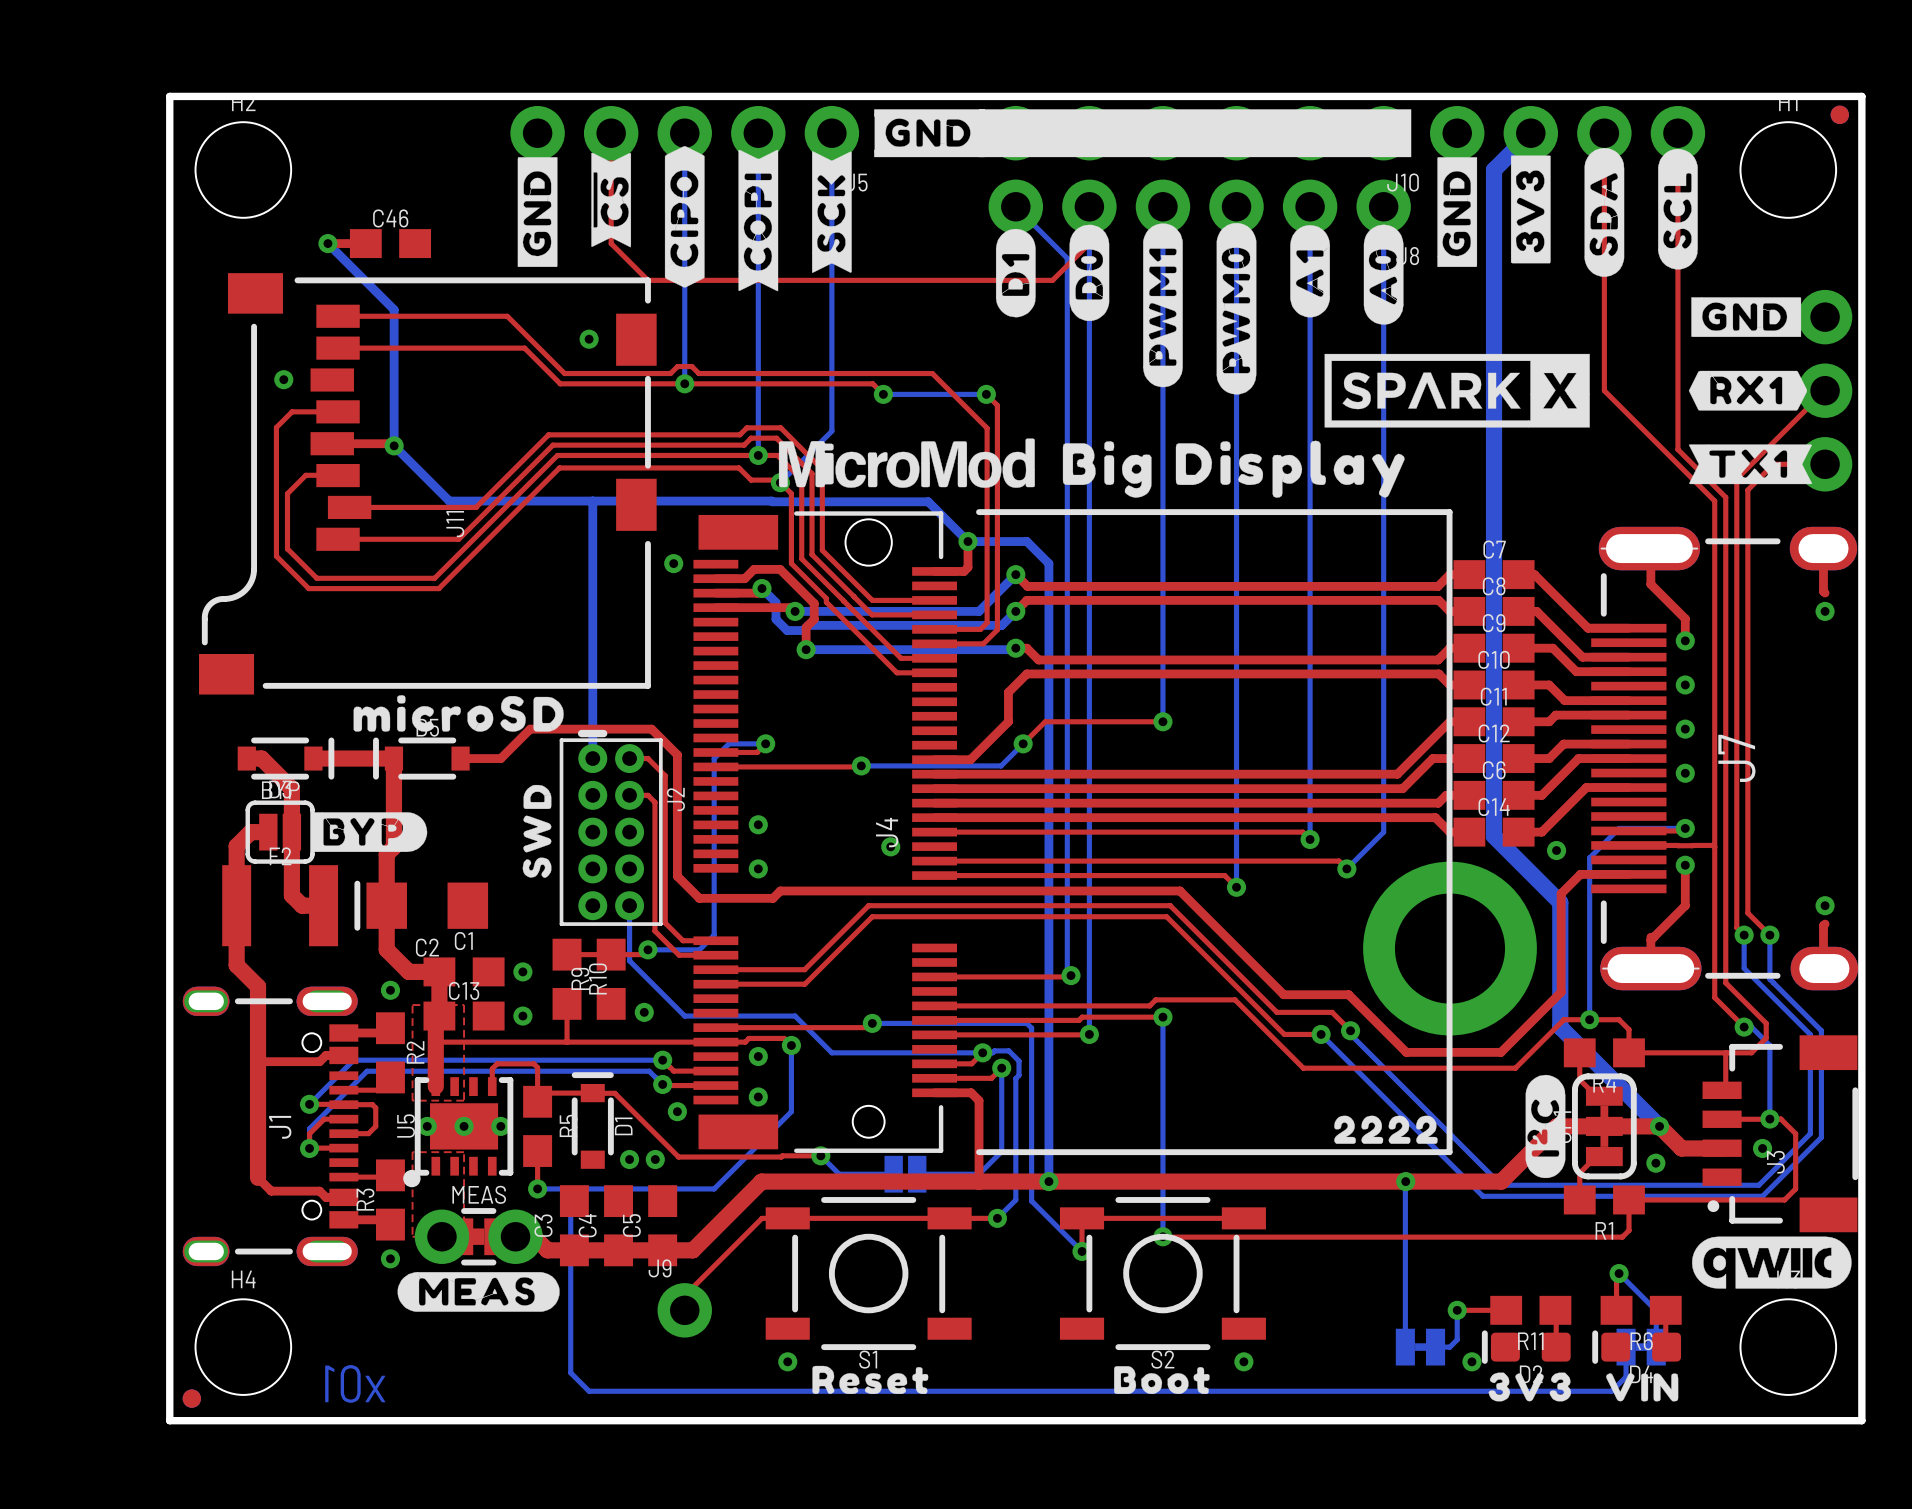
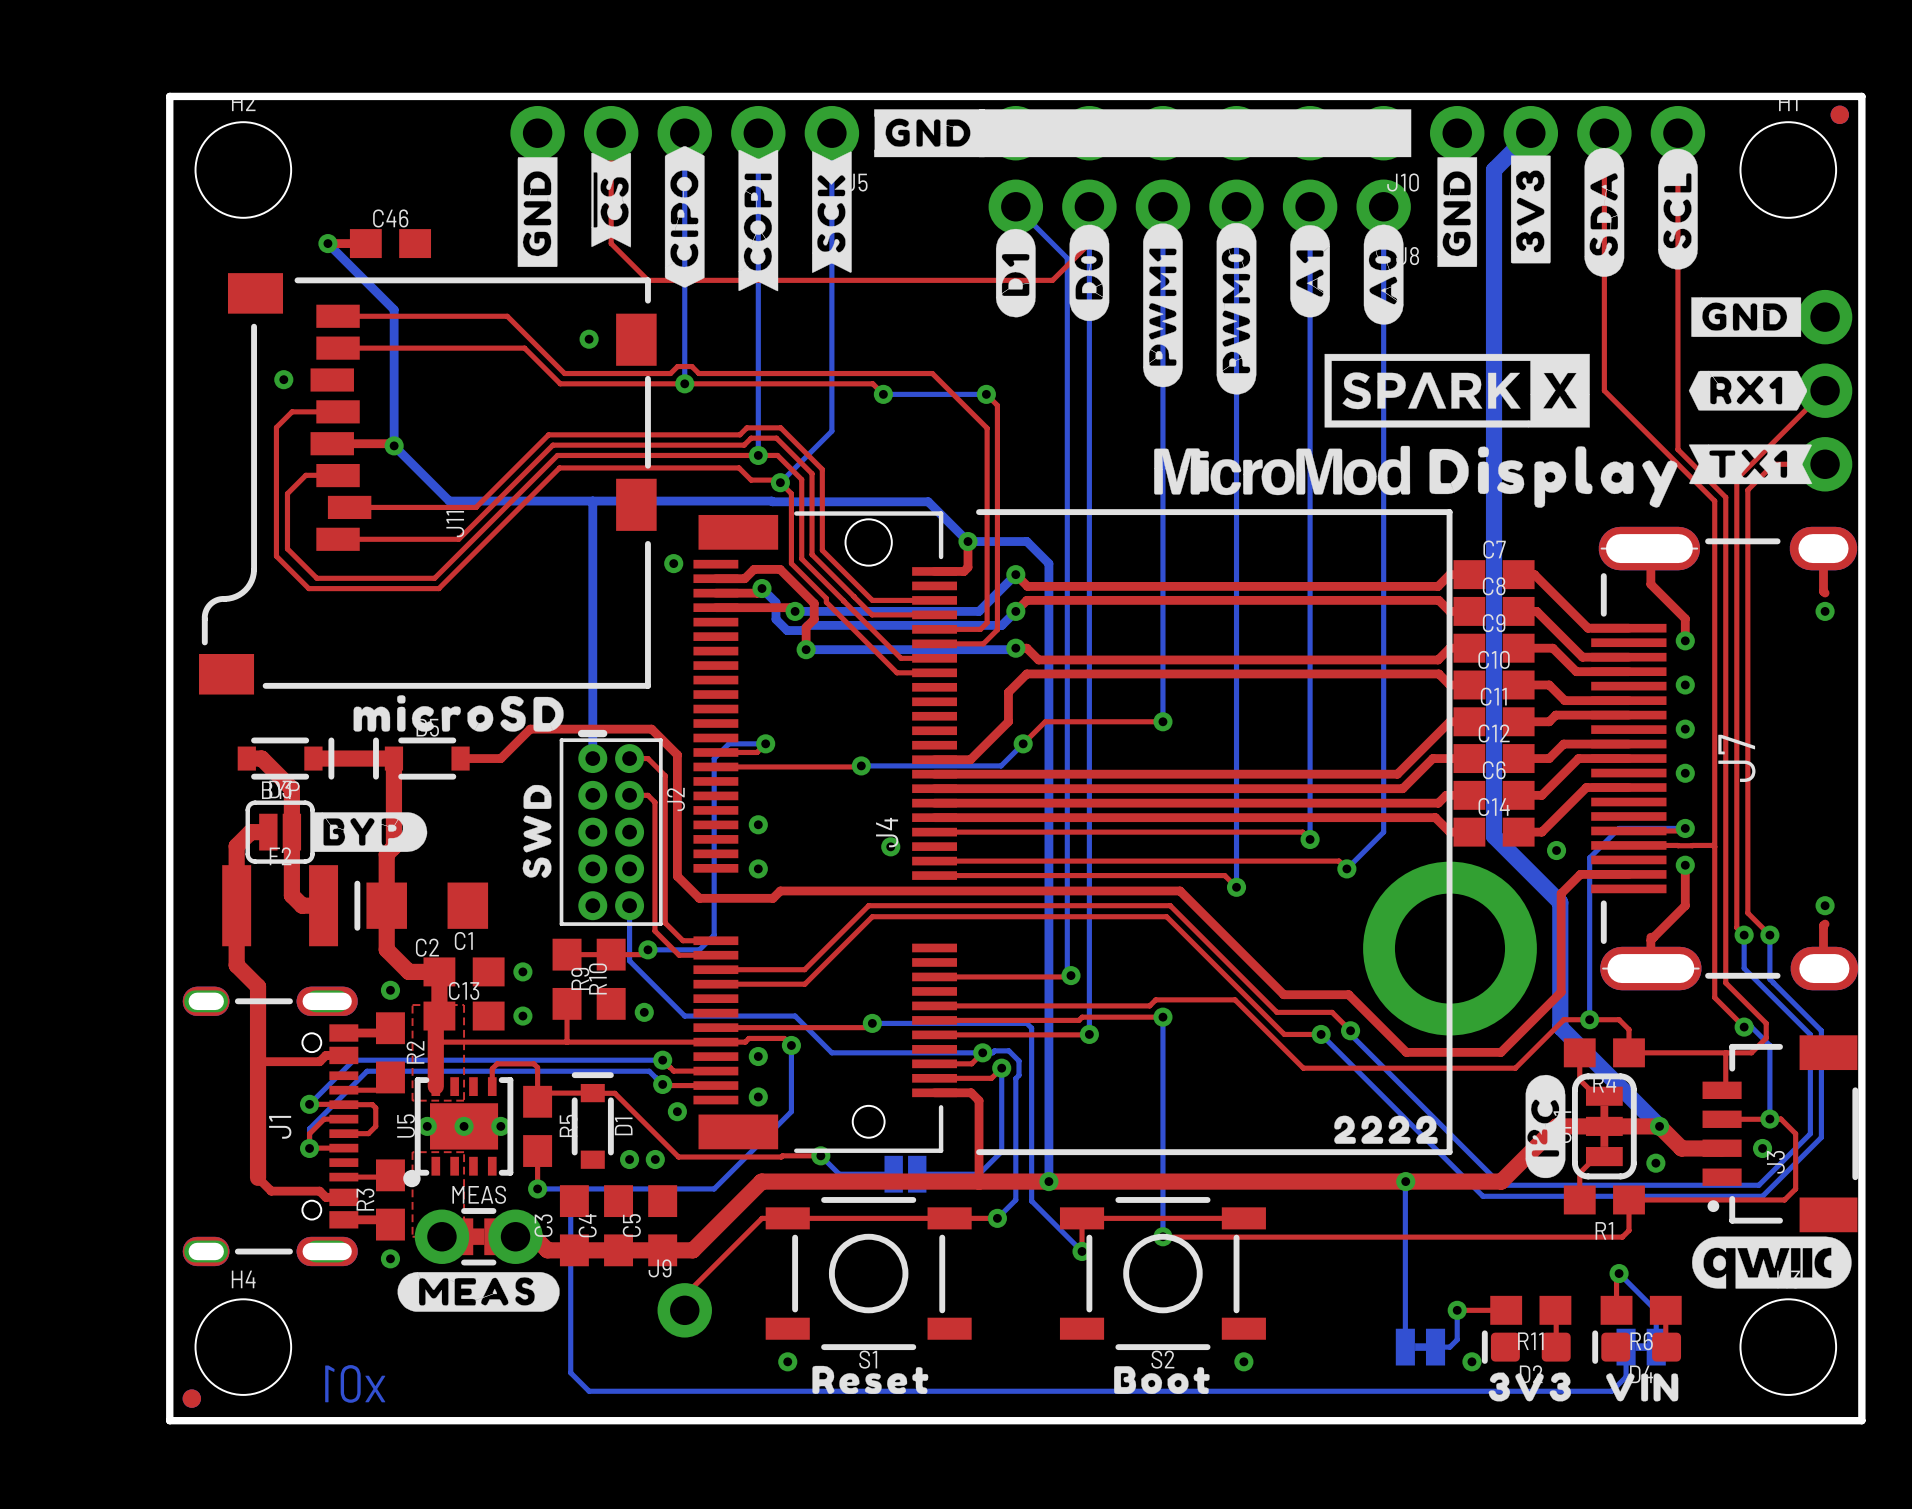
drawing: [1062, 440, 1405, 498] -> none
drawing: none -> [1429, 446, 1678, 508]
drawing position: (906, 463) -> (1282, 470)

